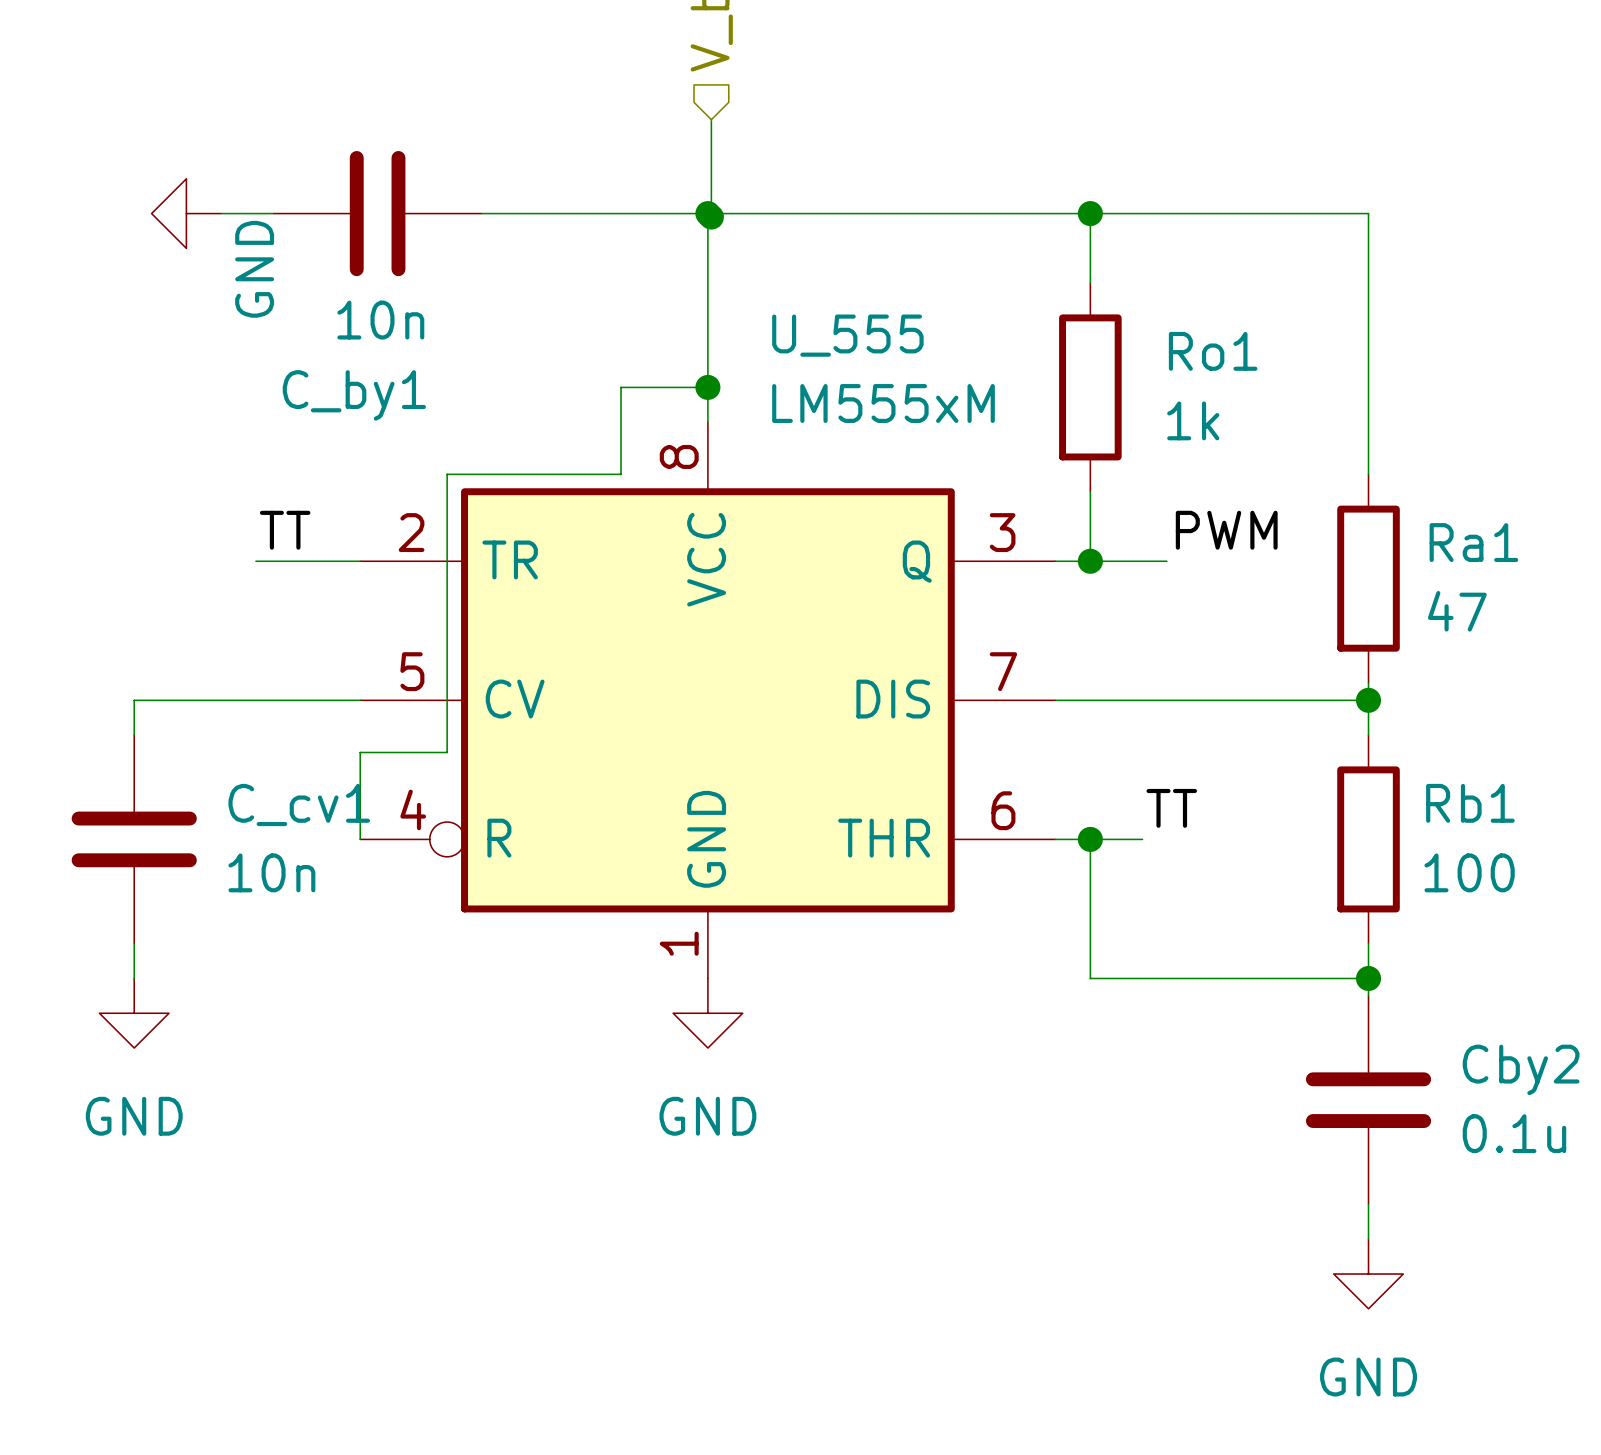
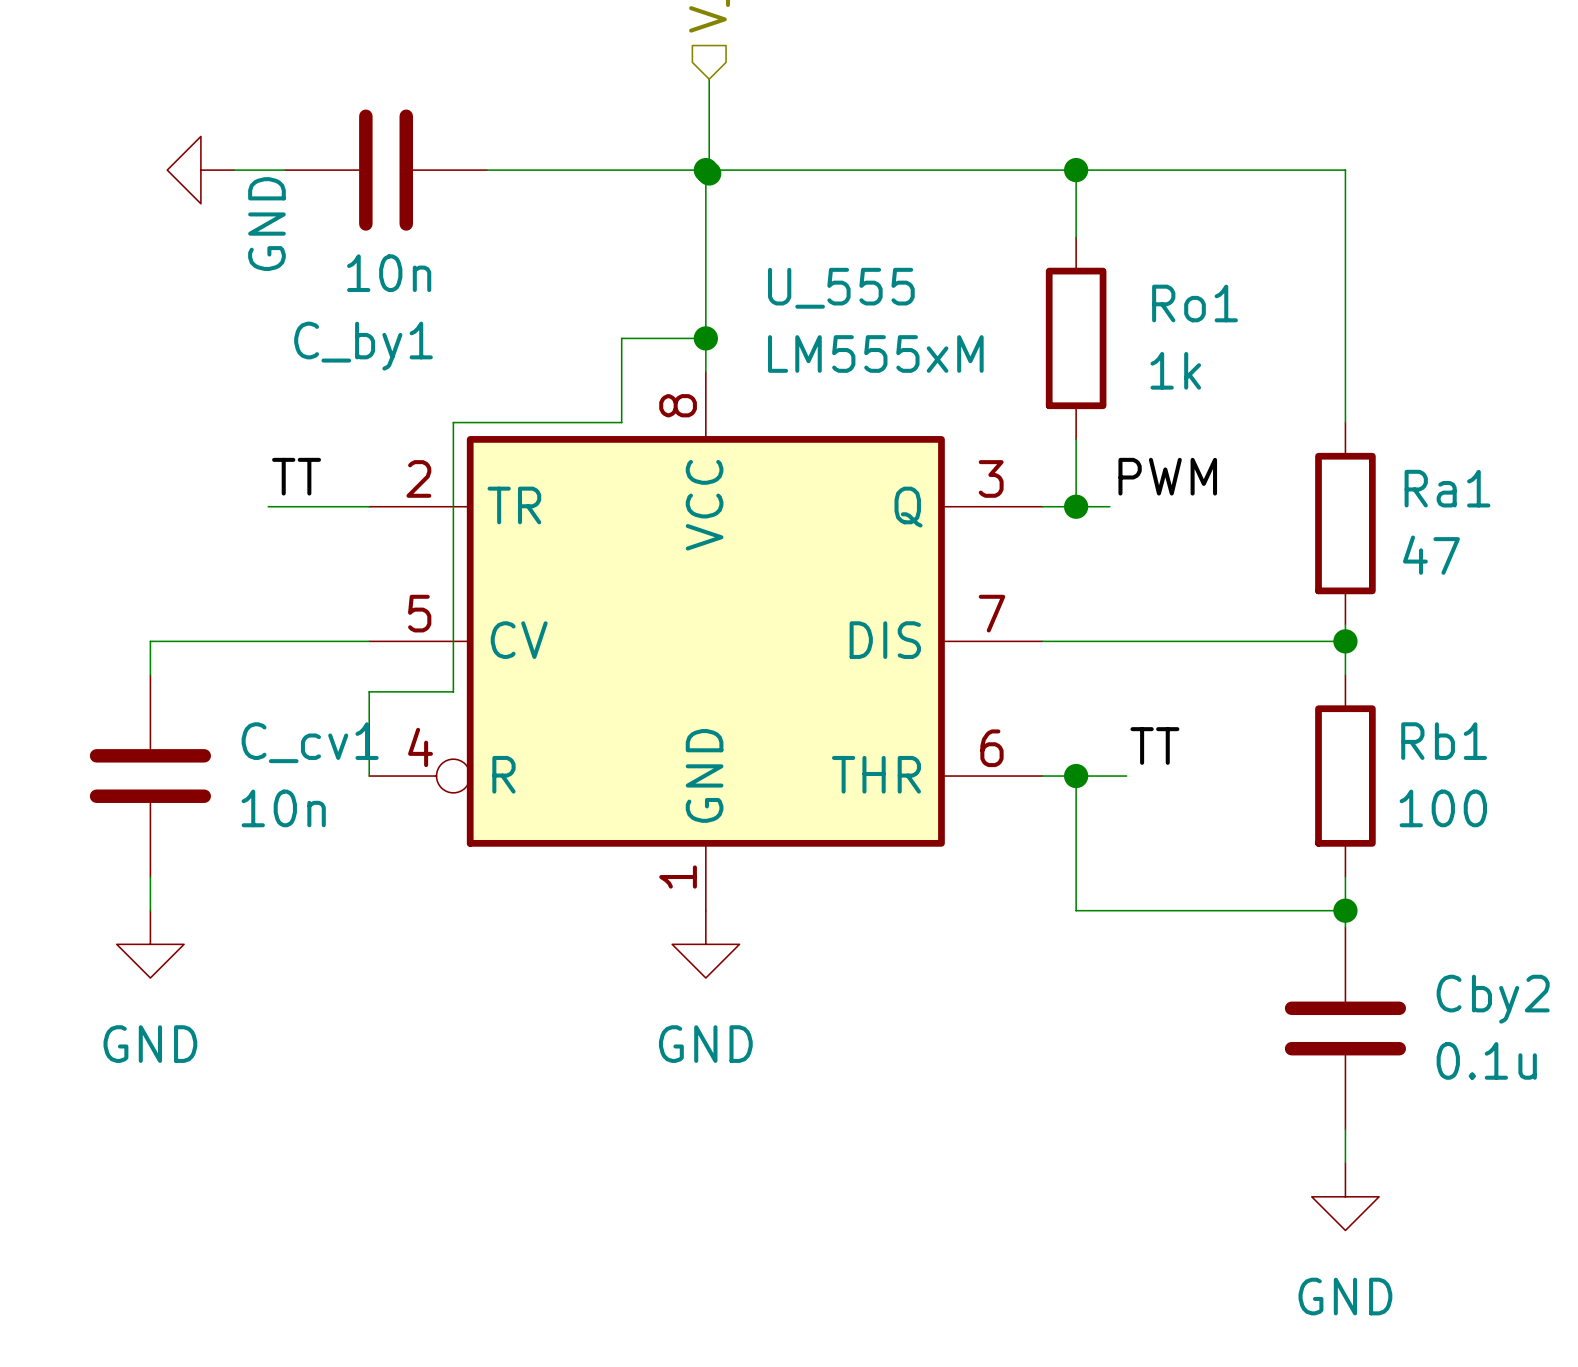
label position: PWM (1226, 530) -> PWM (1167, 476)
wire: (1125, 561) (1166, 561) -> none

